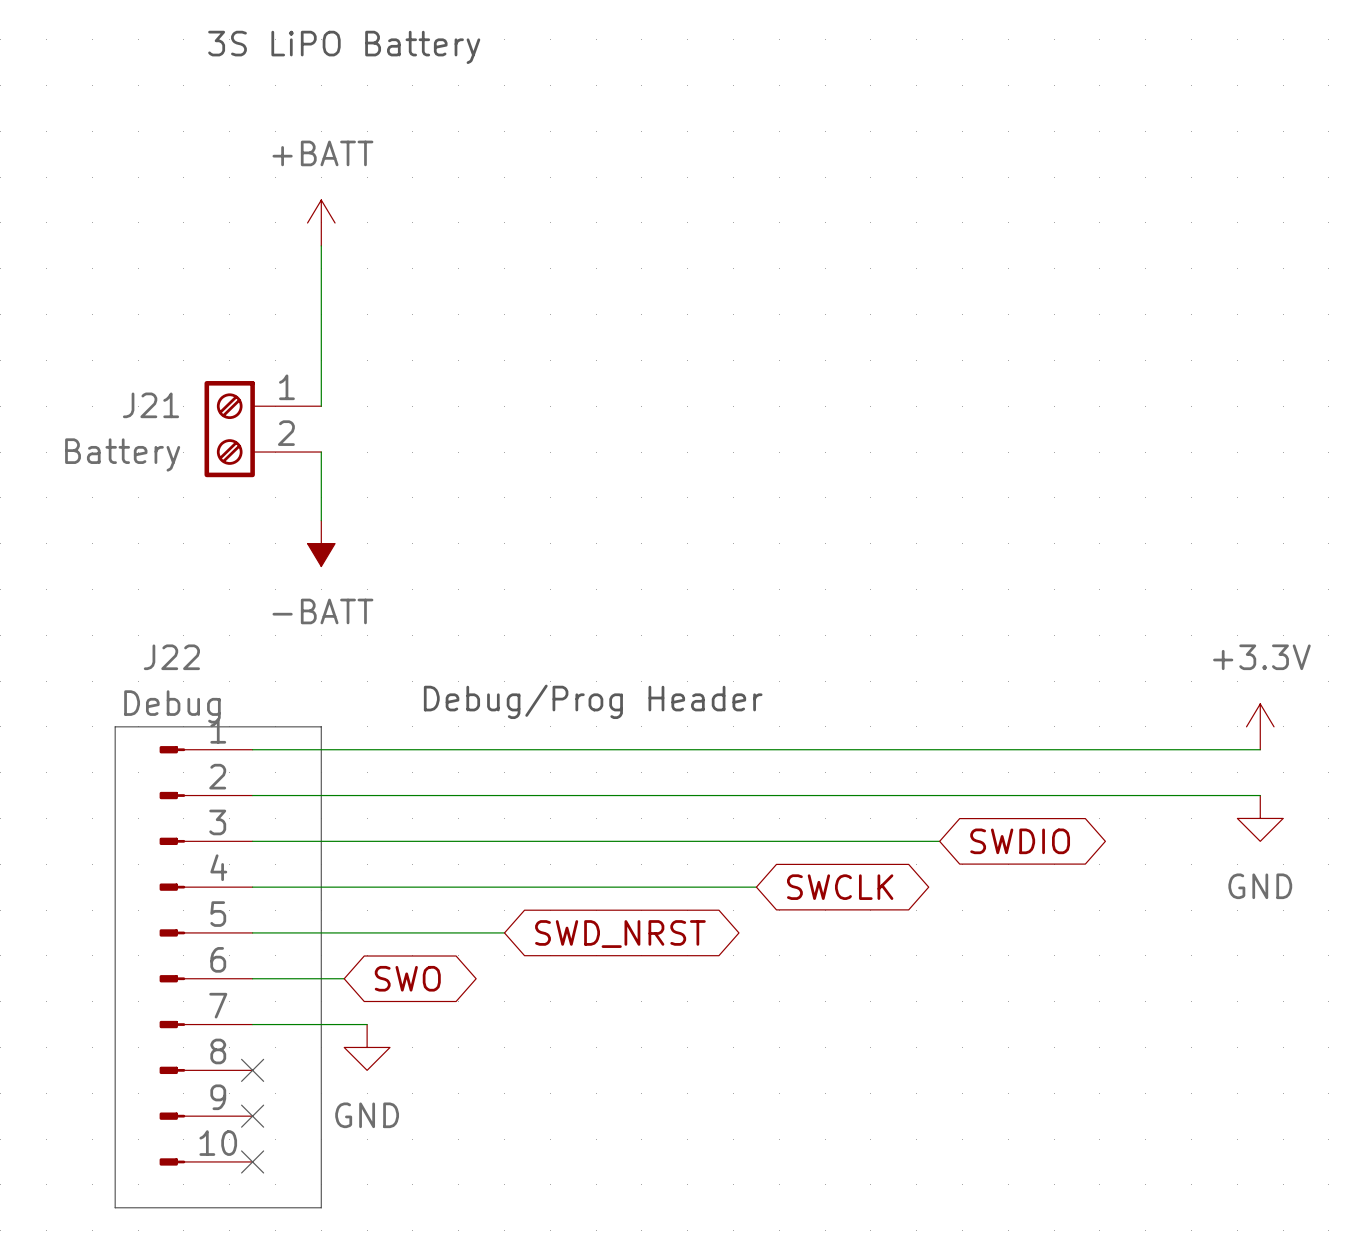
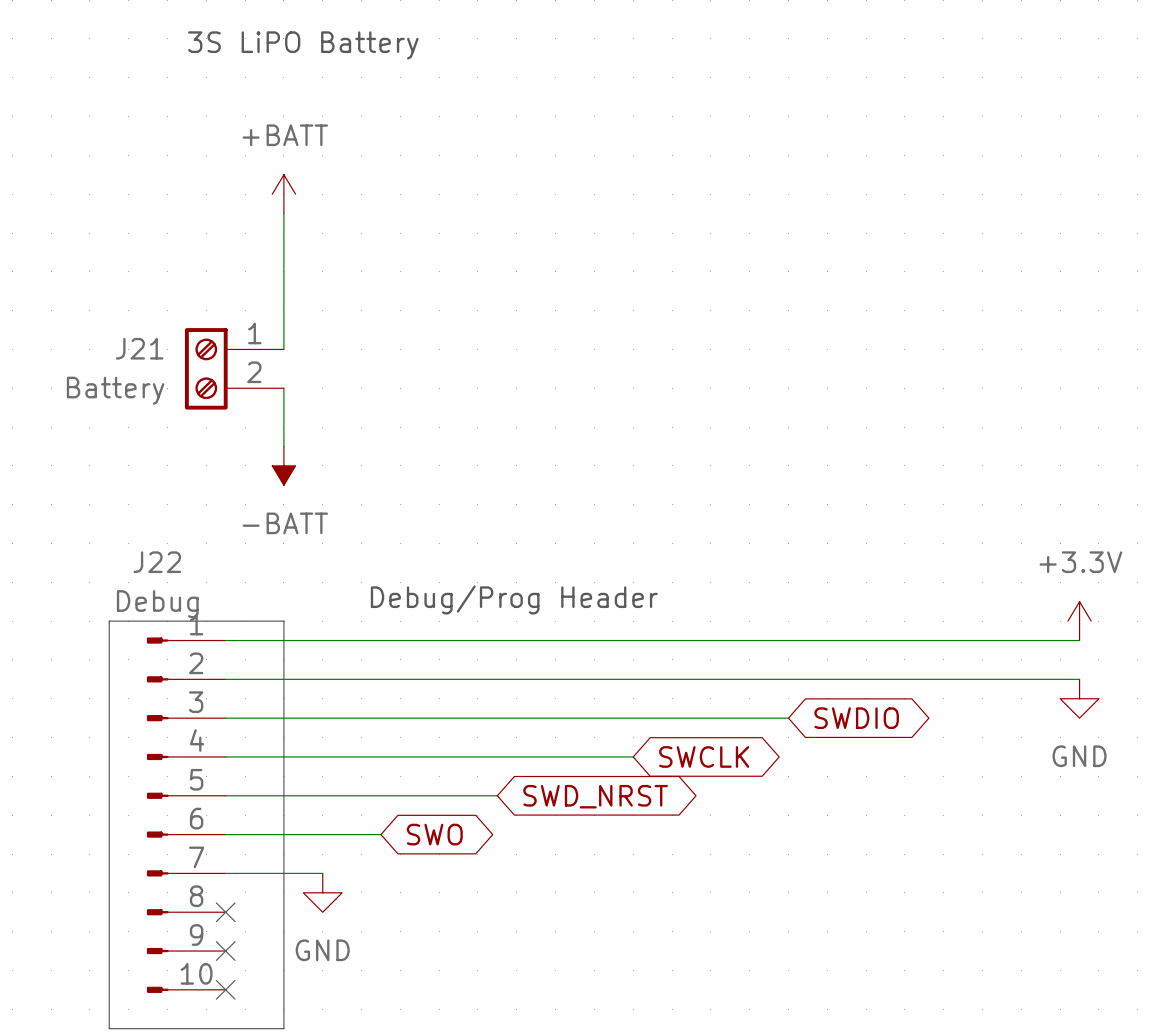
wire: (916, 841) (939, 841) -> none
global label position: SWDIO (1020, 841) -> SWDIO (856, 718)
wire: (733, 887) (756, 887) -> none
global label position: SWCLK (840, 887) -> SWCLK (704, 756)
wire: none -> (439, 795) (497, 795)
global label position: SWD_NRST (620, 934) -> SWD_NRST (595, 796)
wire: none -> (303, 834) (380, 834)
global label position: SWO (407, 978) -> SWO (434, 834)

